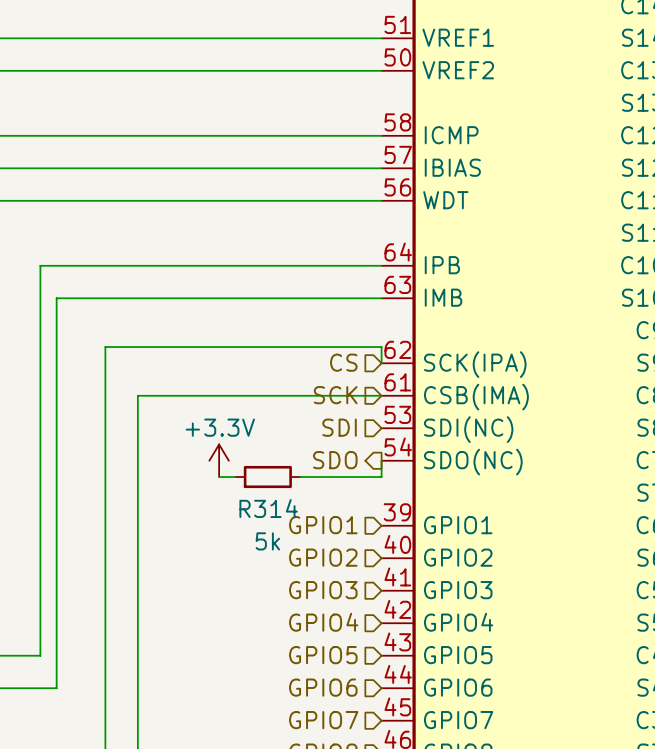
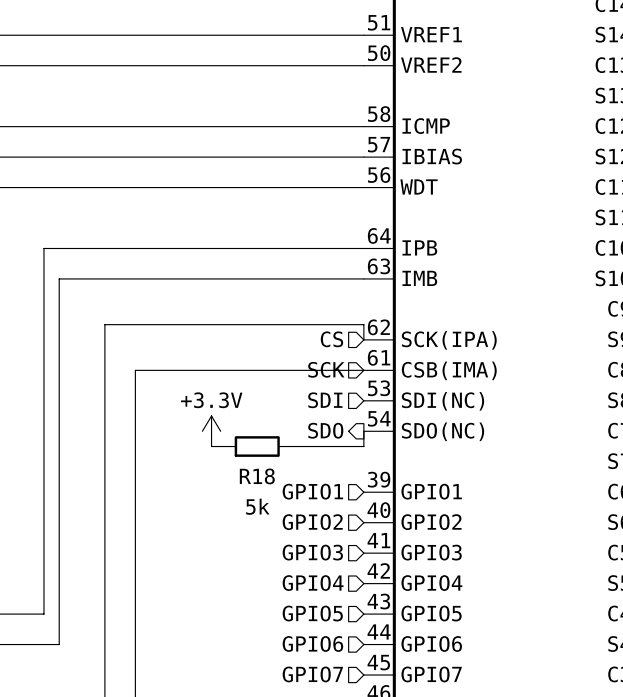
R314 name: R314 (268, 508) -> R18 (257, 476)

